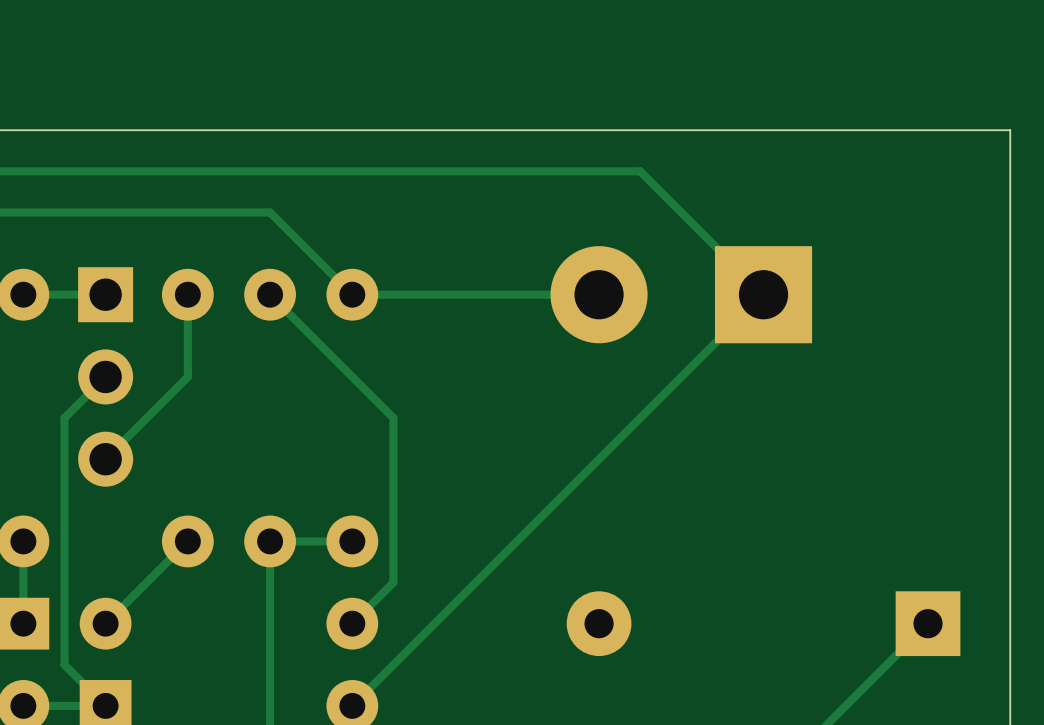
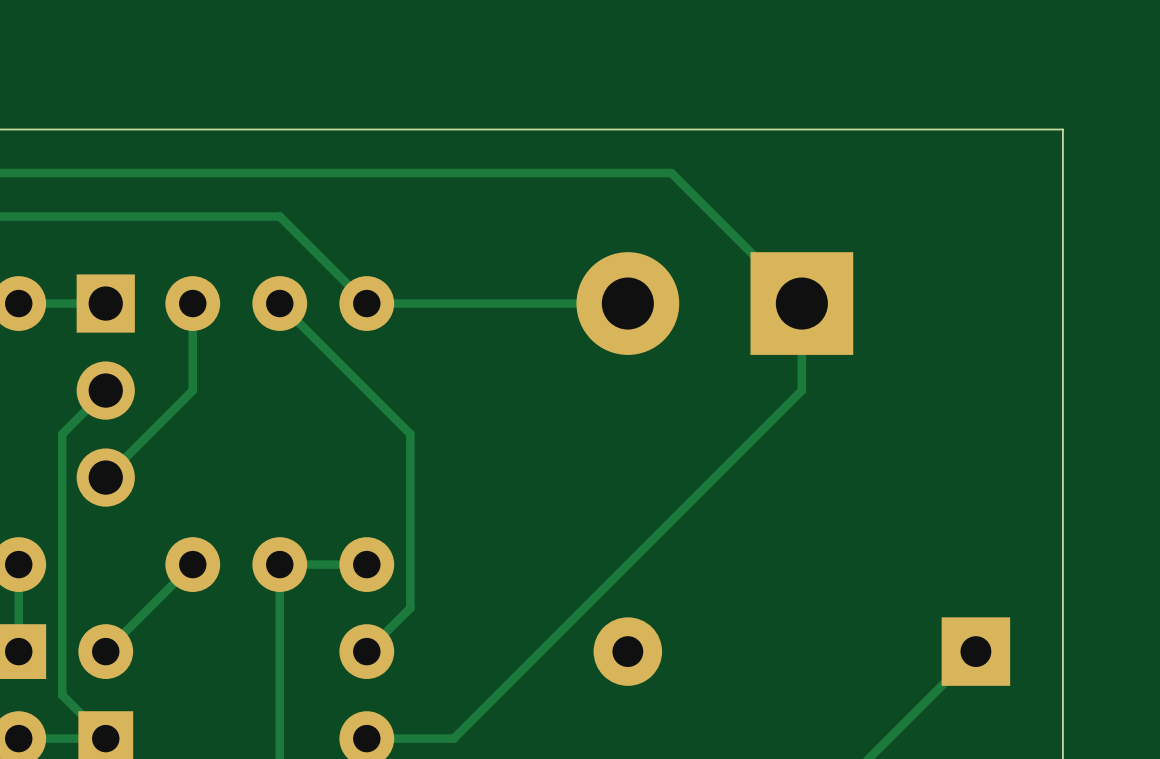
track: (763, 294) (352, 705) -> (801, 303) (801, 390) (453, 738) (366, 738)

